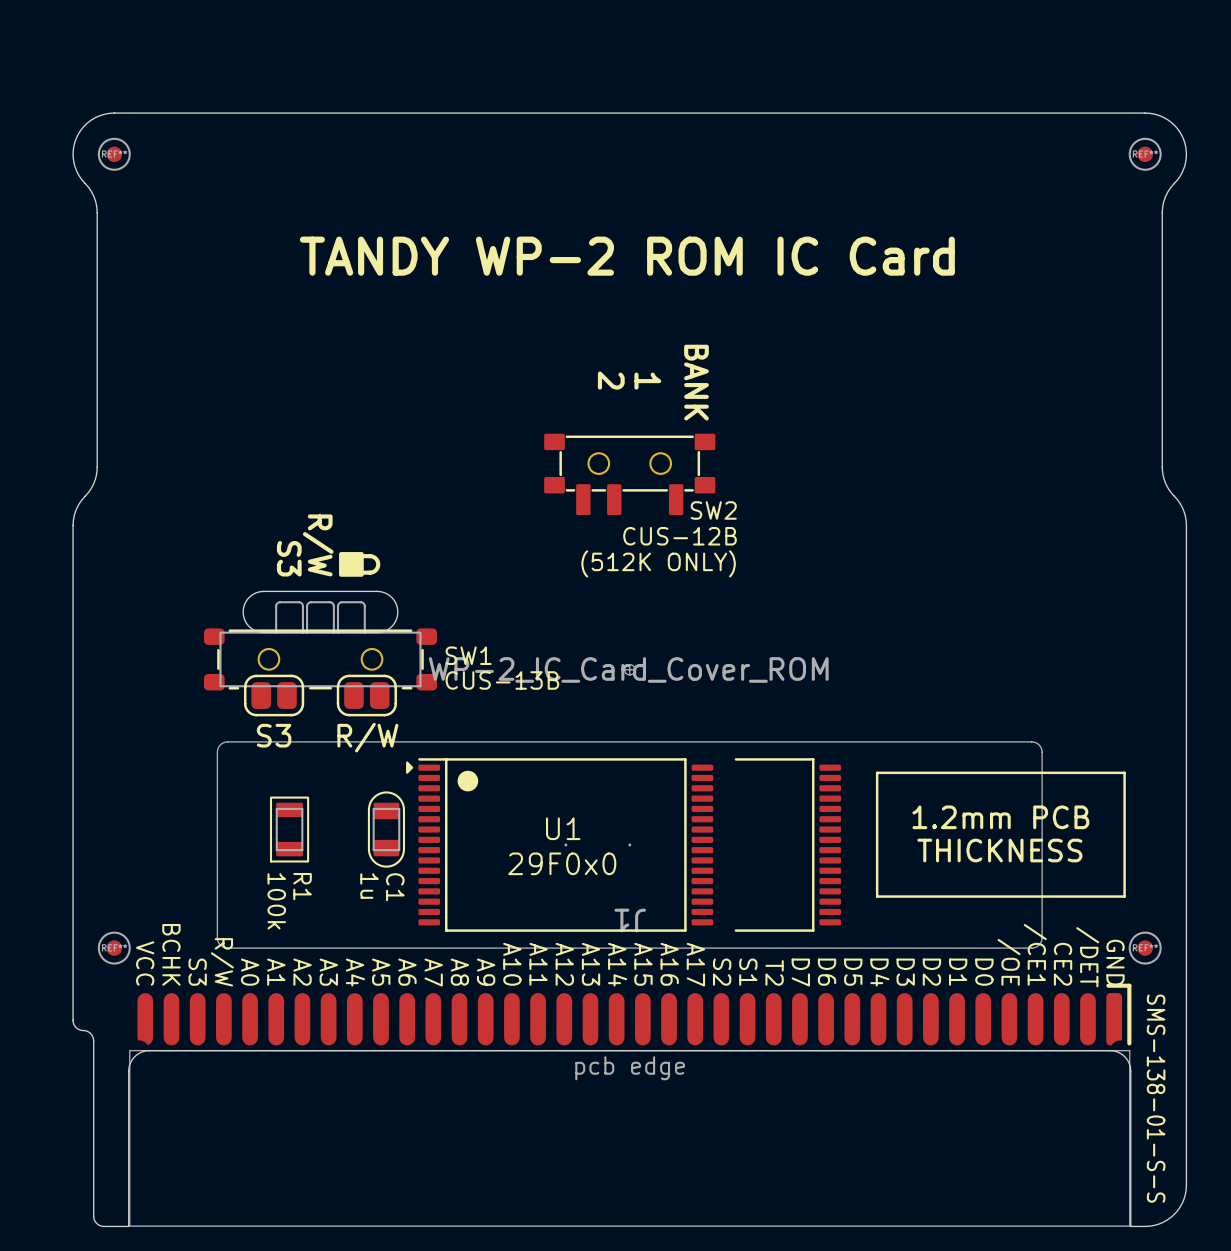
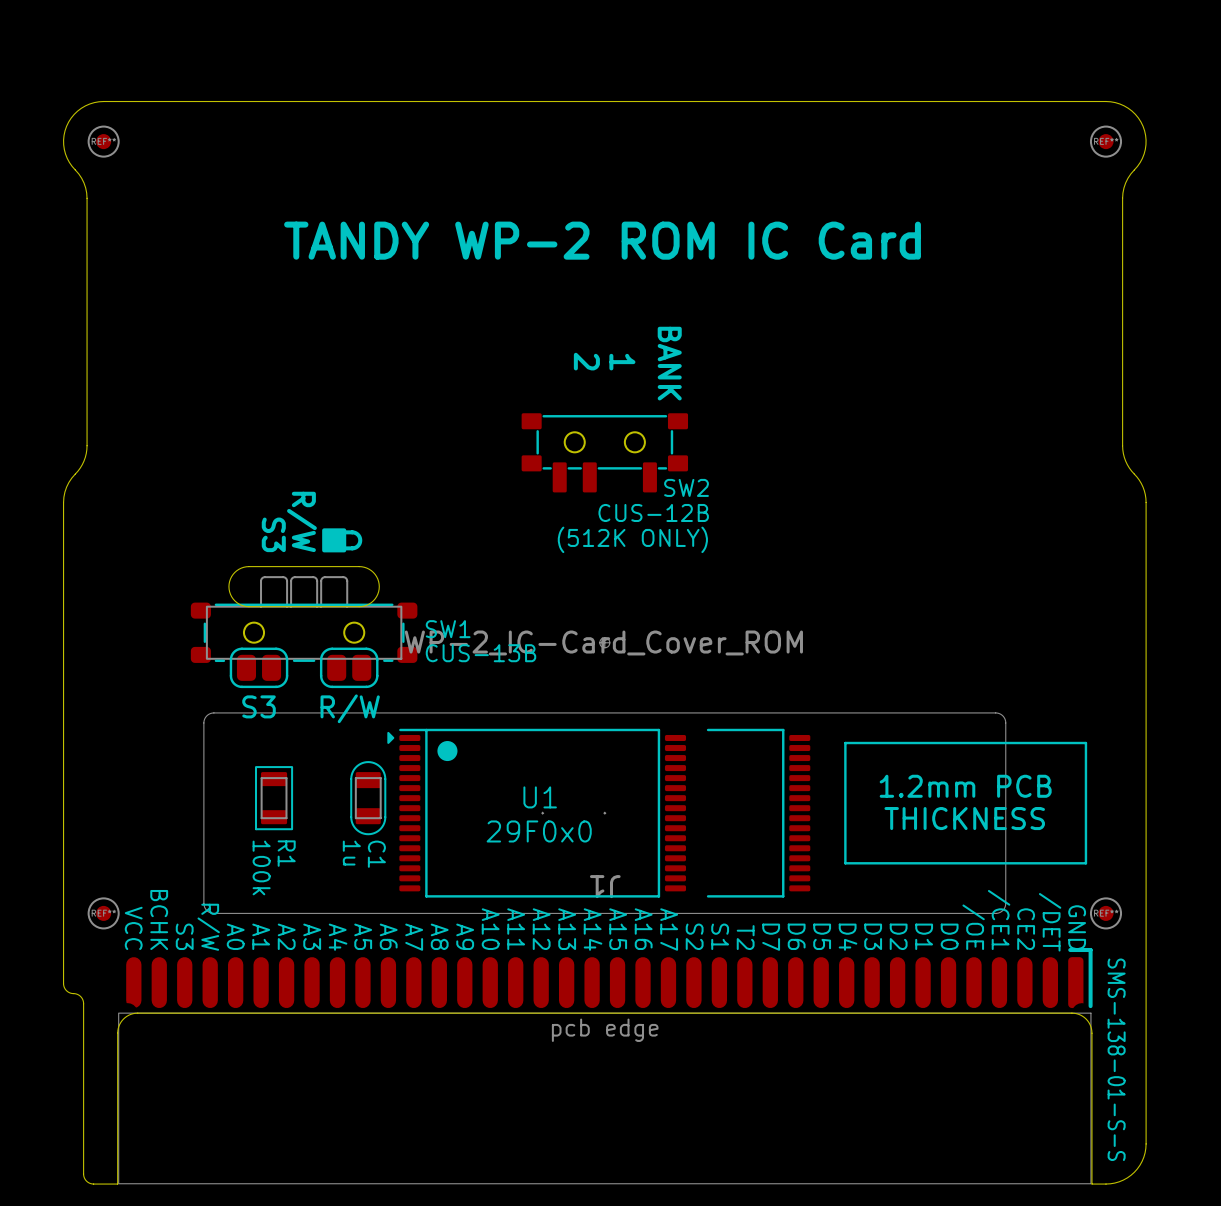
part value: WP-2_IC_Card_Cover_ROM (628, 669) -> WP-2_IC-Card_Cover_ROM (603, 642)

